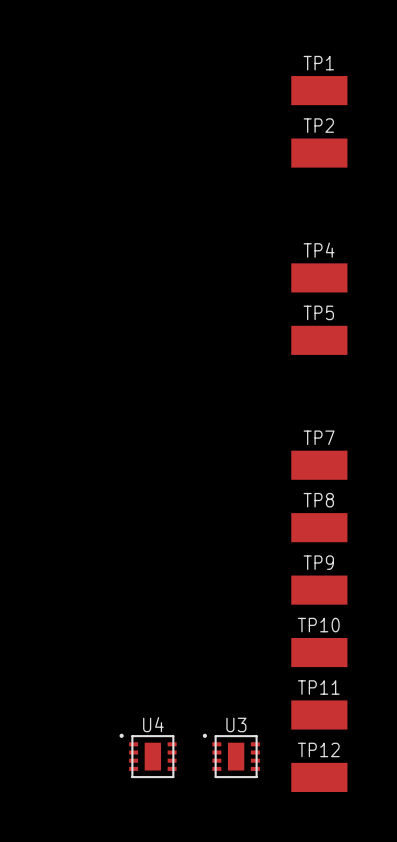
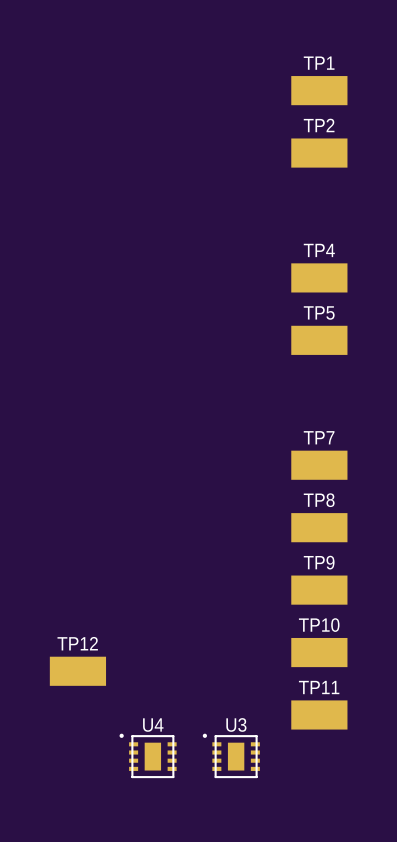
TP12 position: (319, 777) -> (77, 671)

